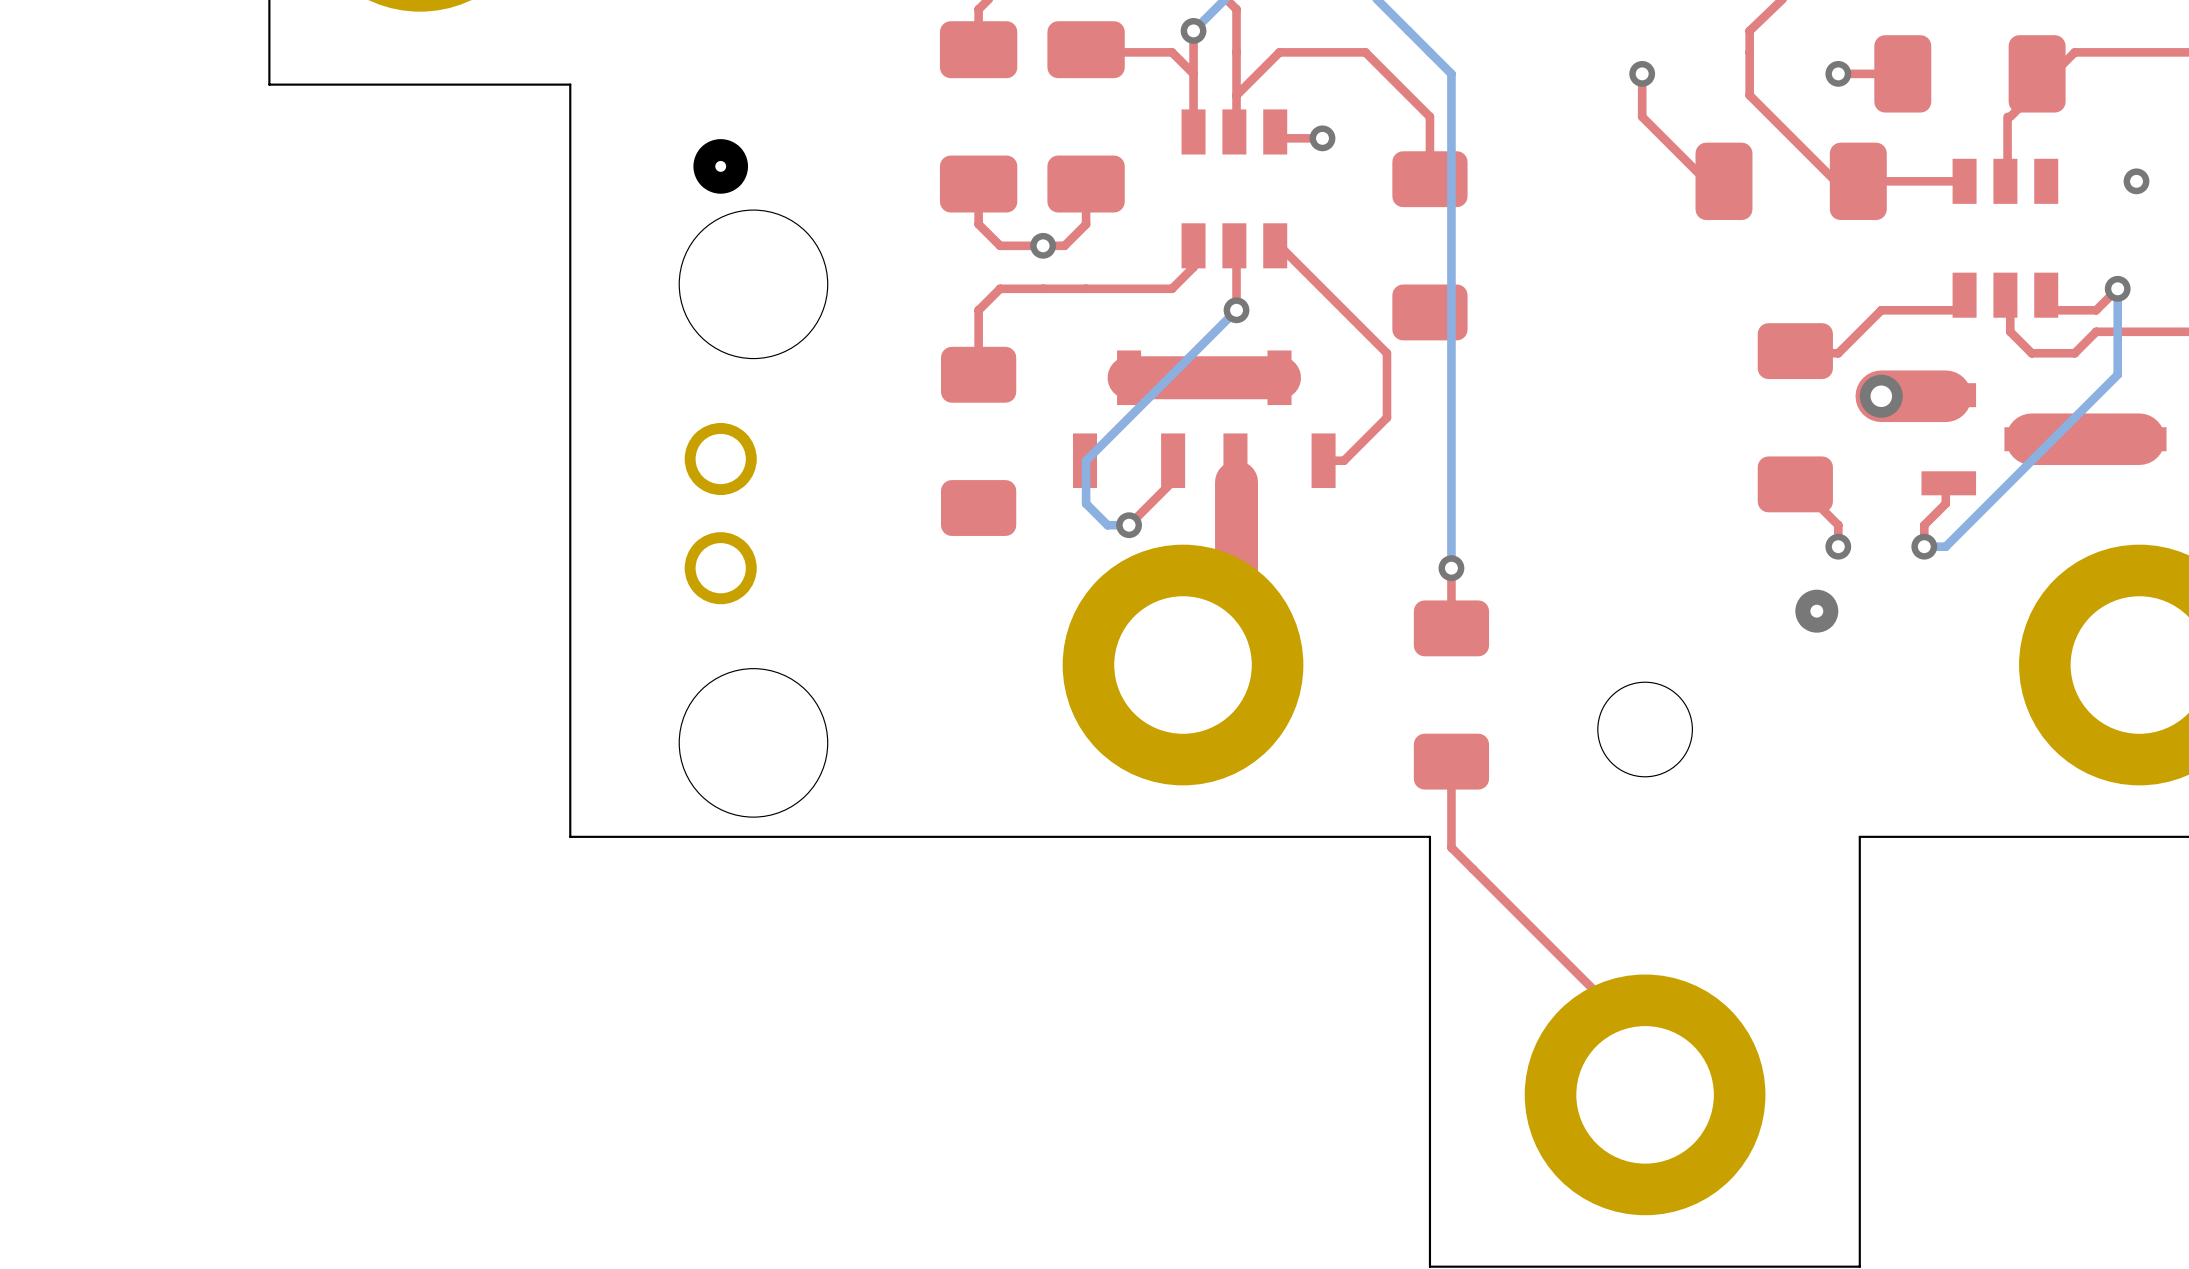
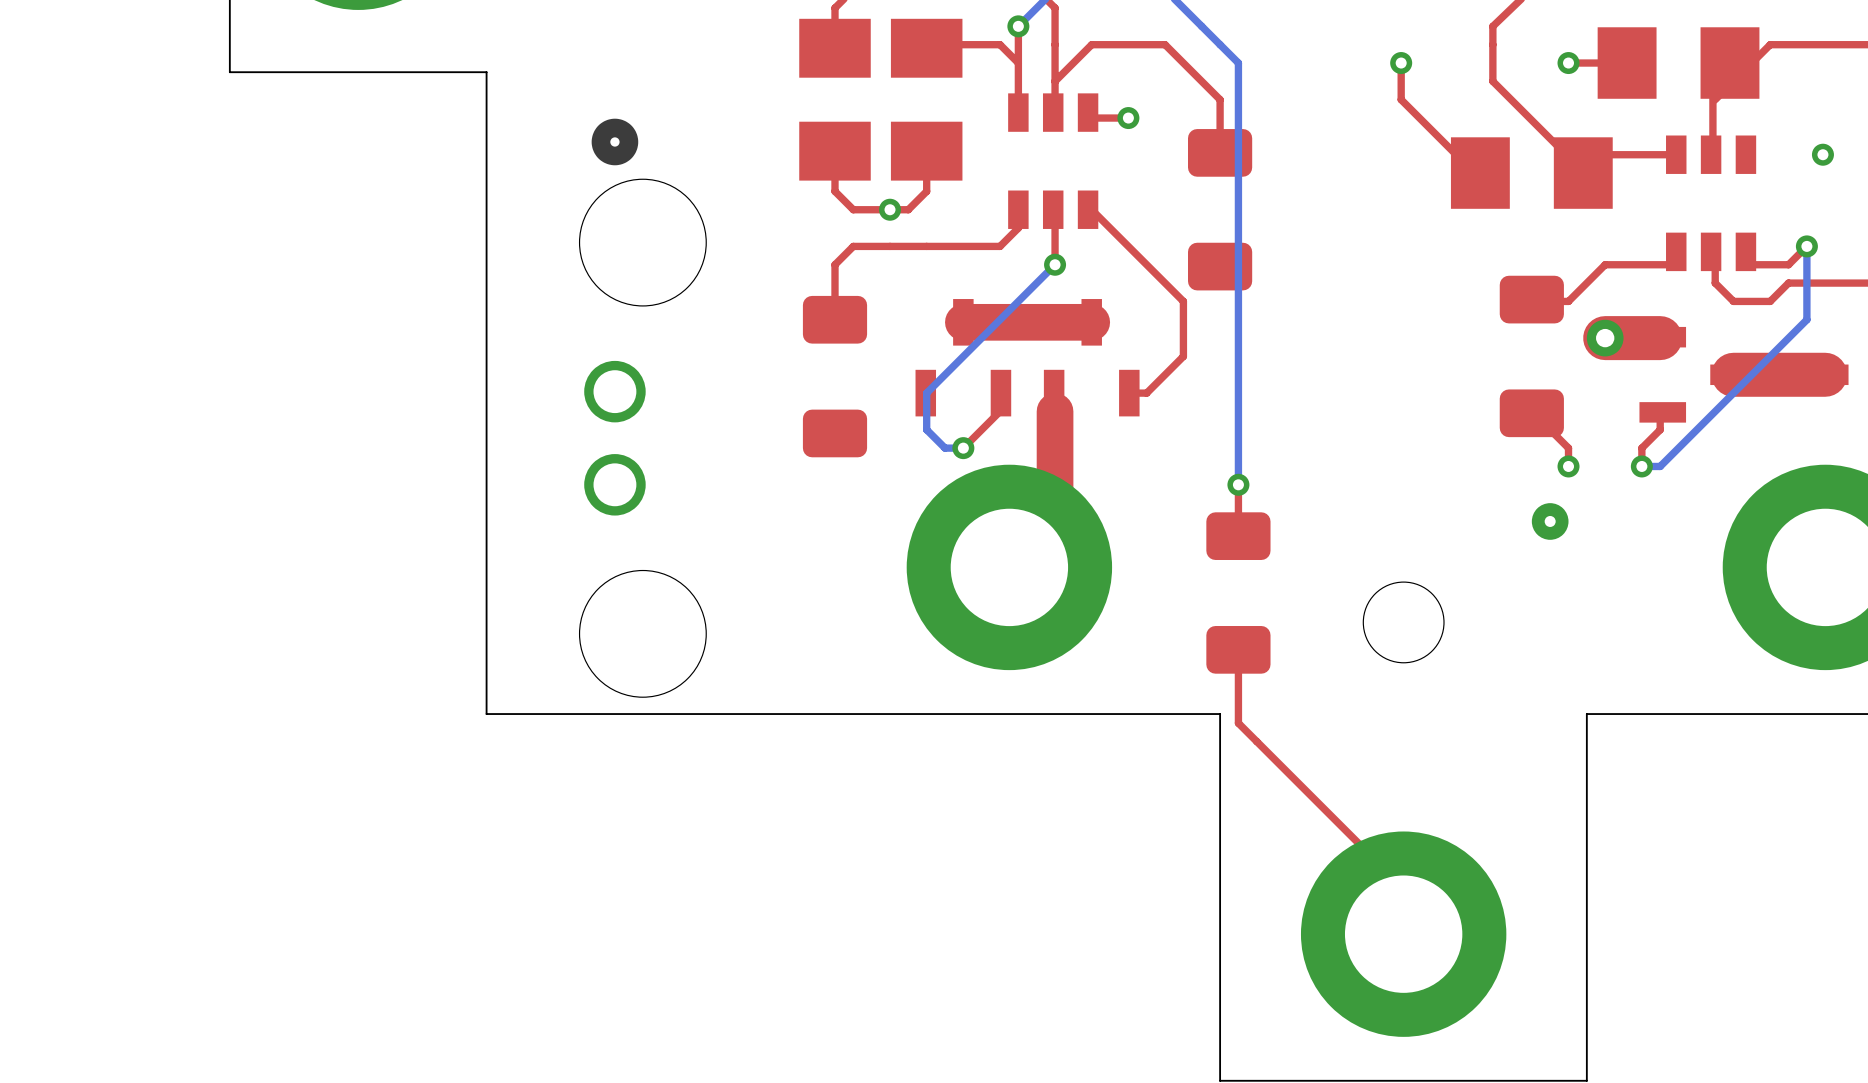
part footprint: [939, 21, 1018, 213] -> [799, 18, 871, 181]
part footprint: [1047, 21, 1125, 213] -> [890, 18, 963, 181]
part footprint: [1874, 35, 2066, 113] -> [1597, 27, 1760, 99]
part footprint: [1695, 142, 1887, 221] -> [1450, 137, 1613, 209]

